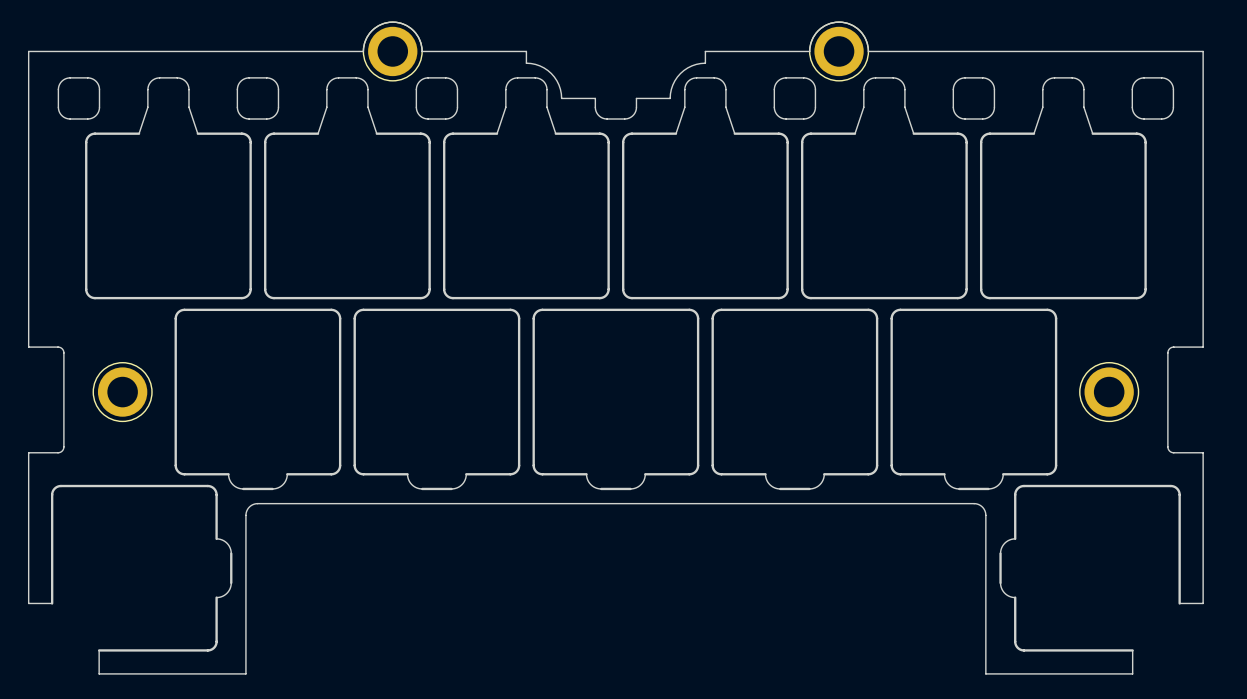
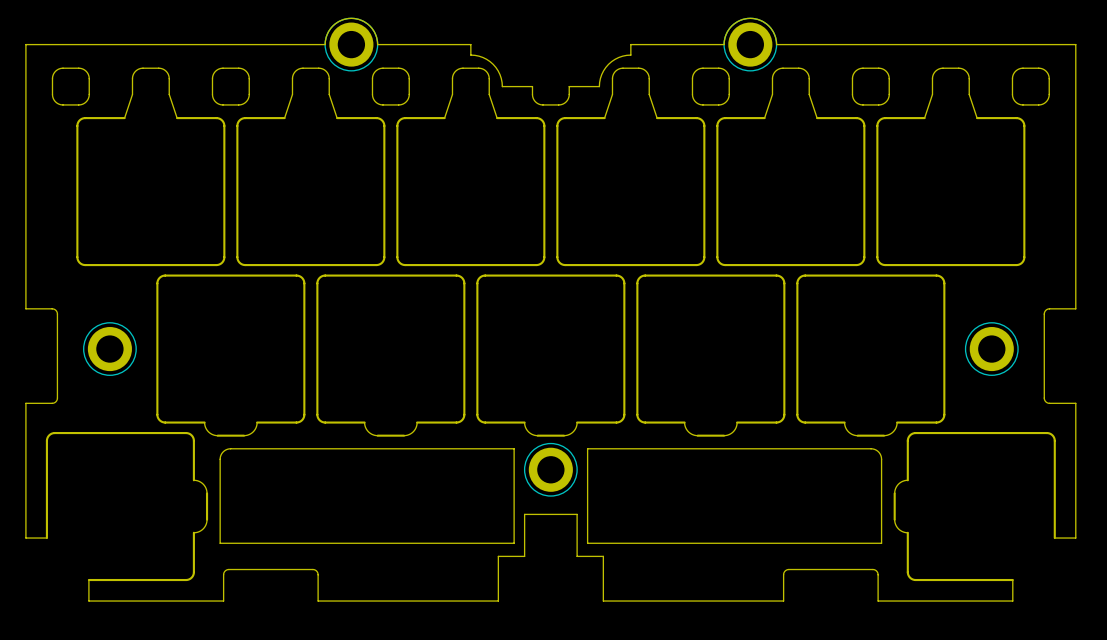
board edge: (657, 503) (574, 503) -> none
part: none -> (550, 469)
board edge: (245, 609) (245, 673) -> (220, 543) (514, 543) (514, 448)
board edge: (985, 609) (985, 673) -> (881, 543) (587, 543) (587, 448)
board edge: none -> (881, 601) (878, 601) (877, 573) (872, 569) (786, 569) (783, 574) (783, 601) (603, 601) (603, 556) (577, 556) (577, 514) (524, 514) (524, 556) (498, 556) (498, 601) (318, 601) (318, 574) (312, 569) (226, 569) (223, 574) (223, 601) (220, 601)

